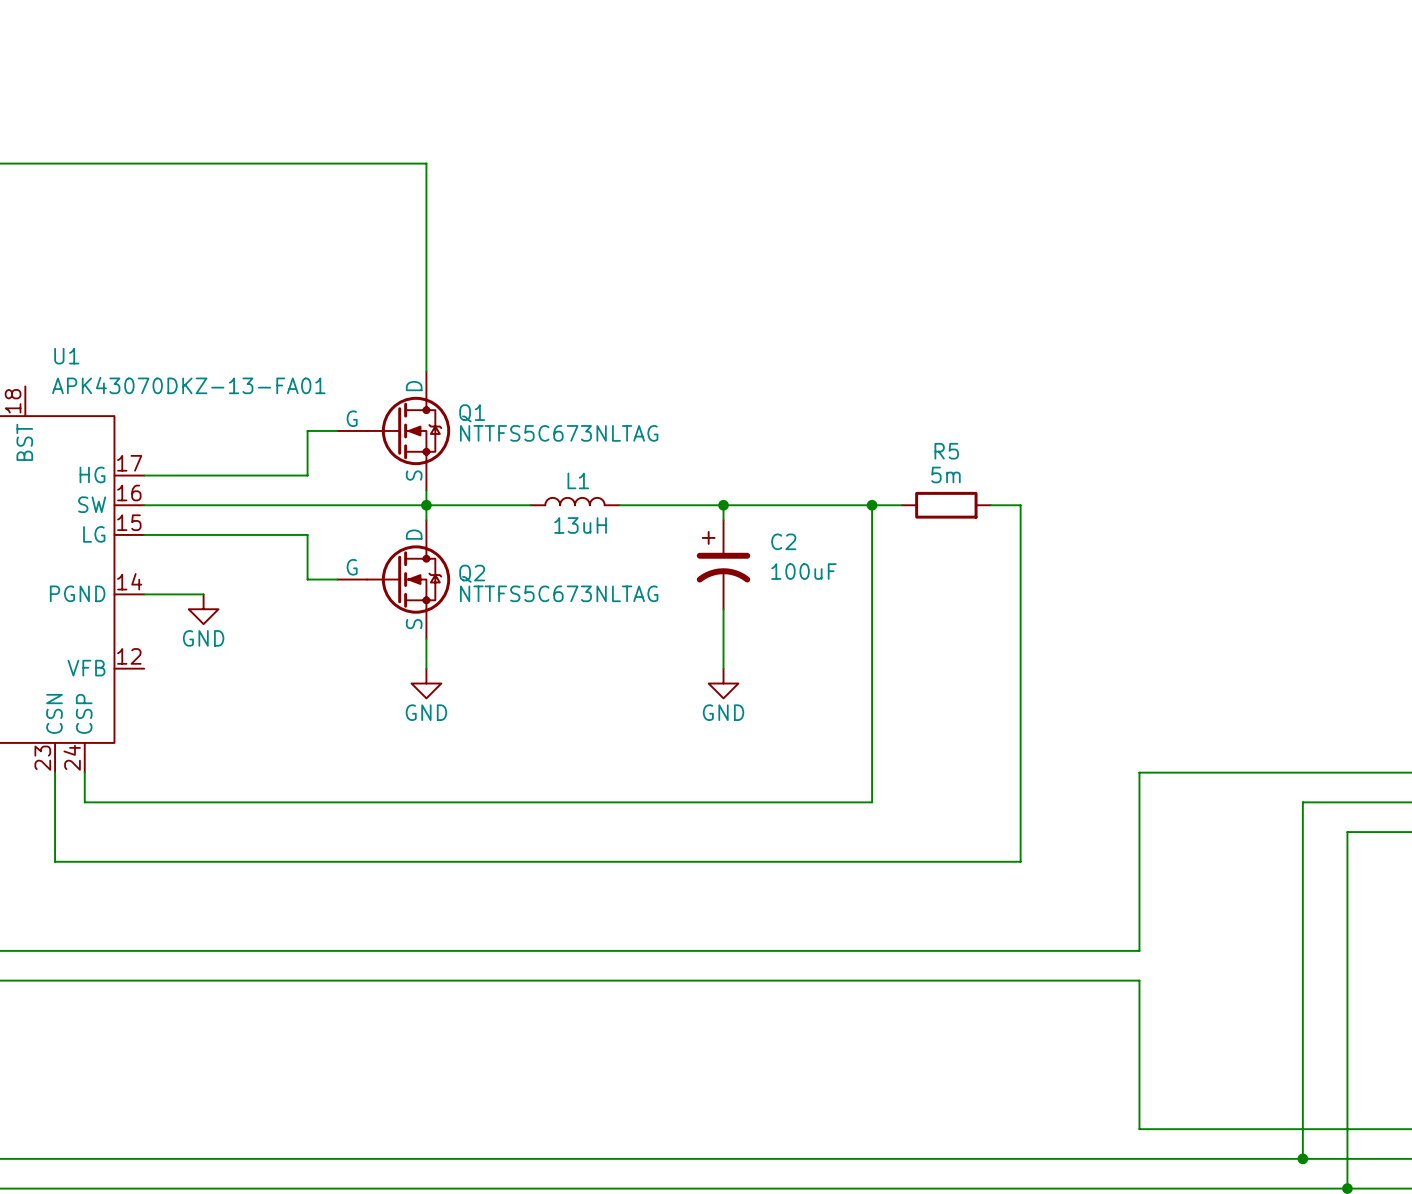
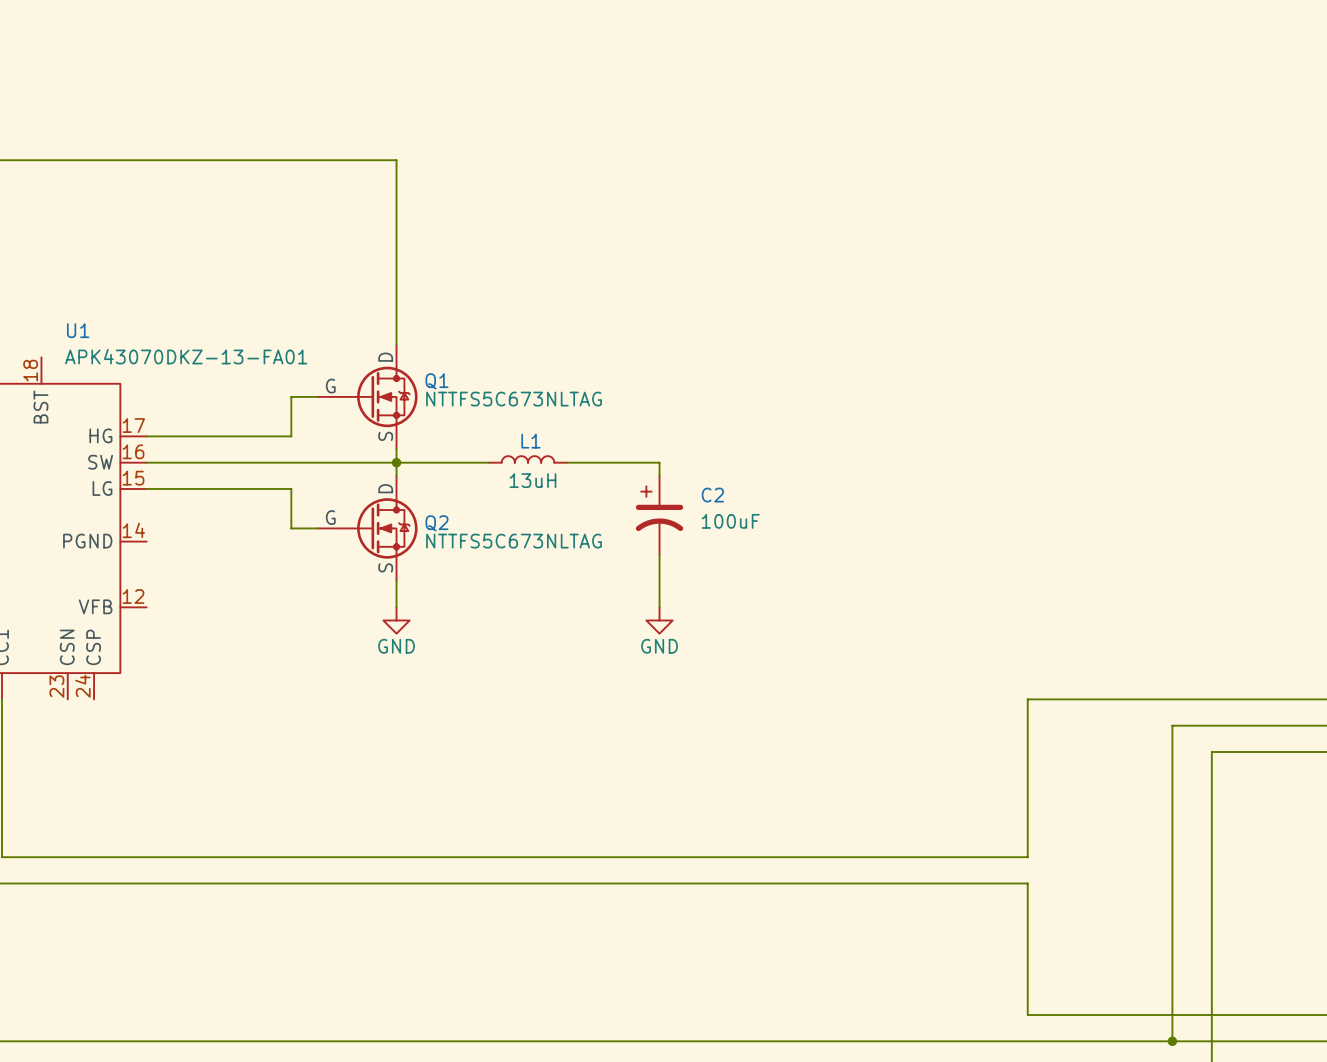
wire: (723, 505) (901, 505) -> none
junction: (723, 505) -> none
wire: (872, 505) (872, 802) (84, 802) (84, 772) -> none
junction: (872, 505) -> none
R5: 5m (946, 505) -> none
wire: (990, 505) (1020, 505) (1020, 861) (55, 861) (55, 772) -> none
wire: (144, 594) (203, 594) -> none
power symbol: GND (203, 609) -> none

